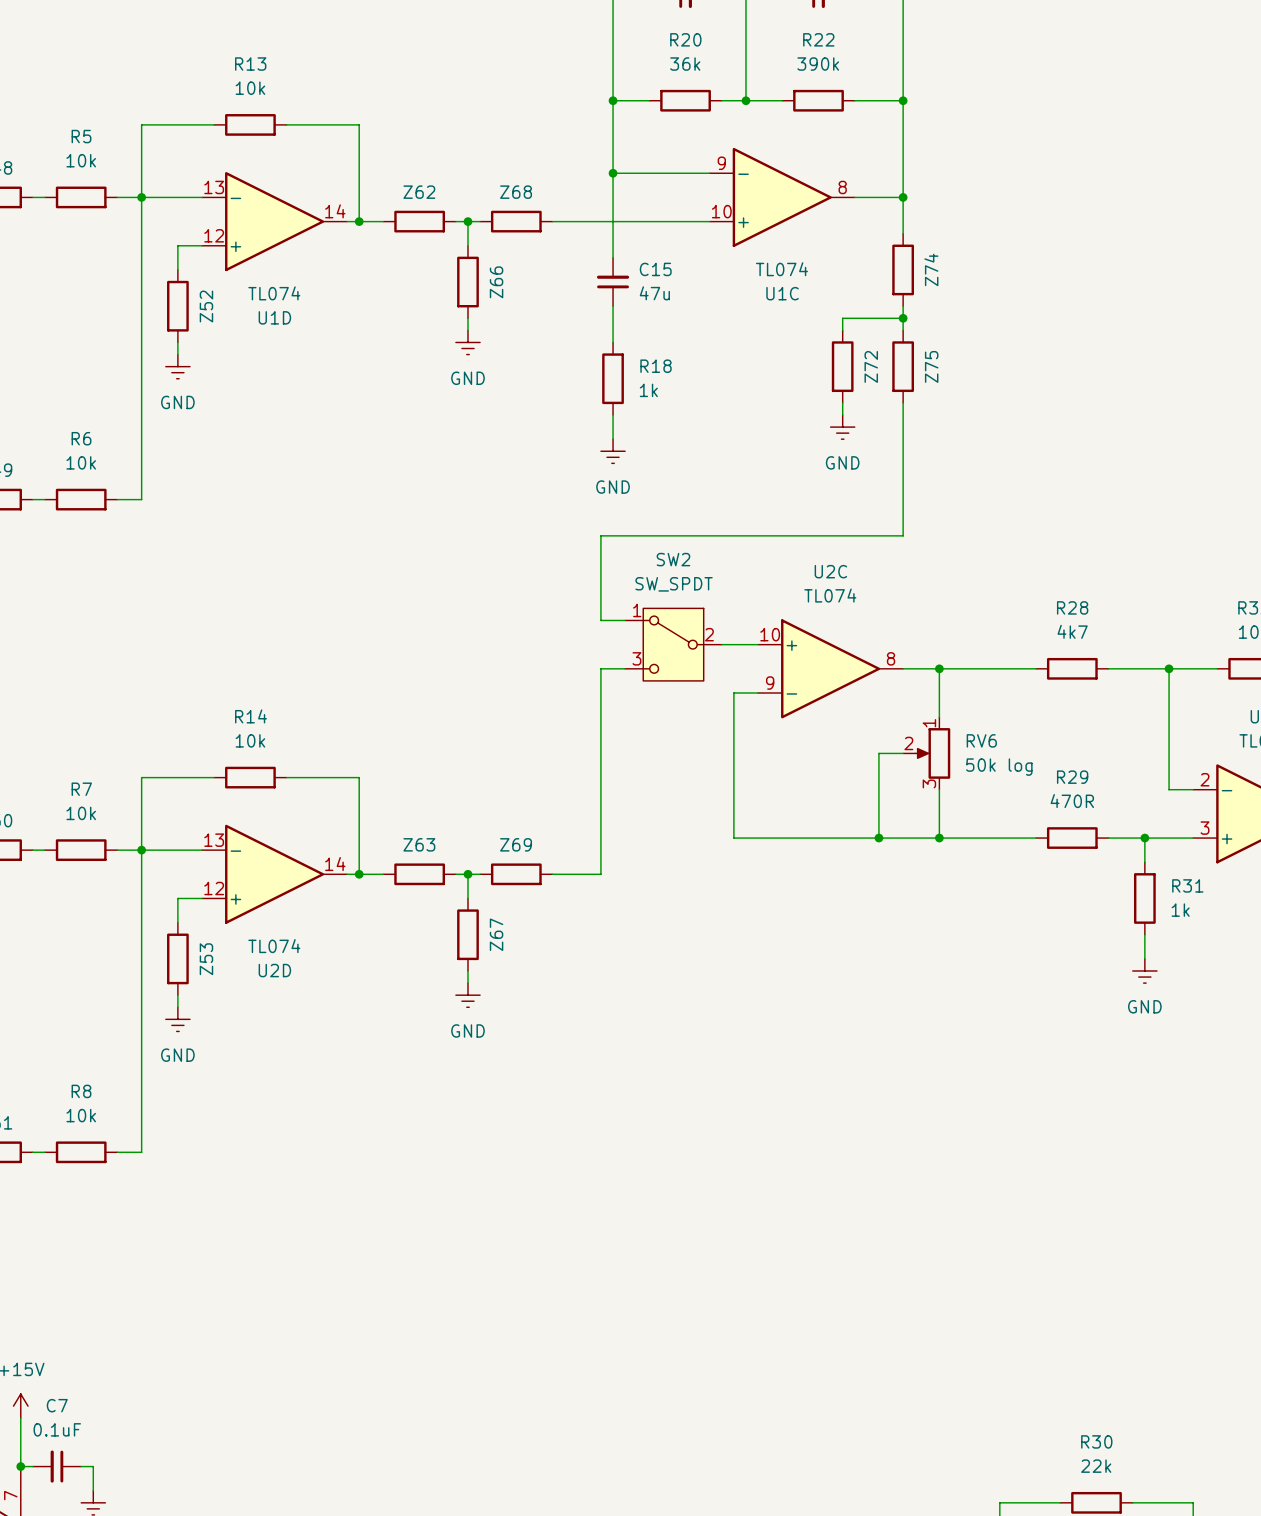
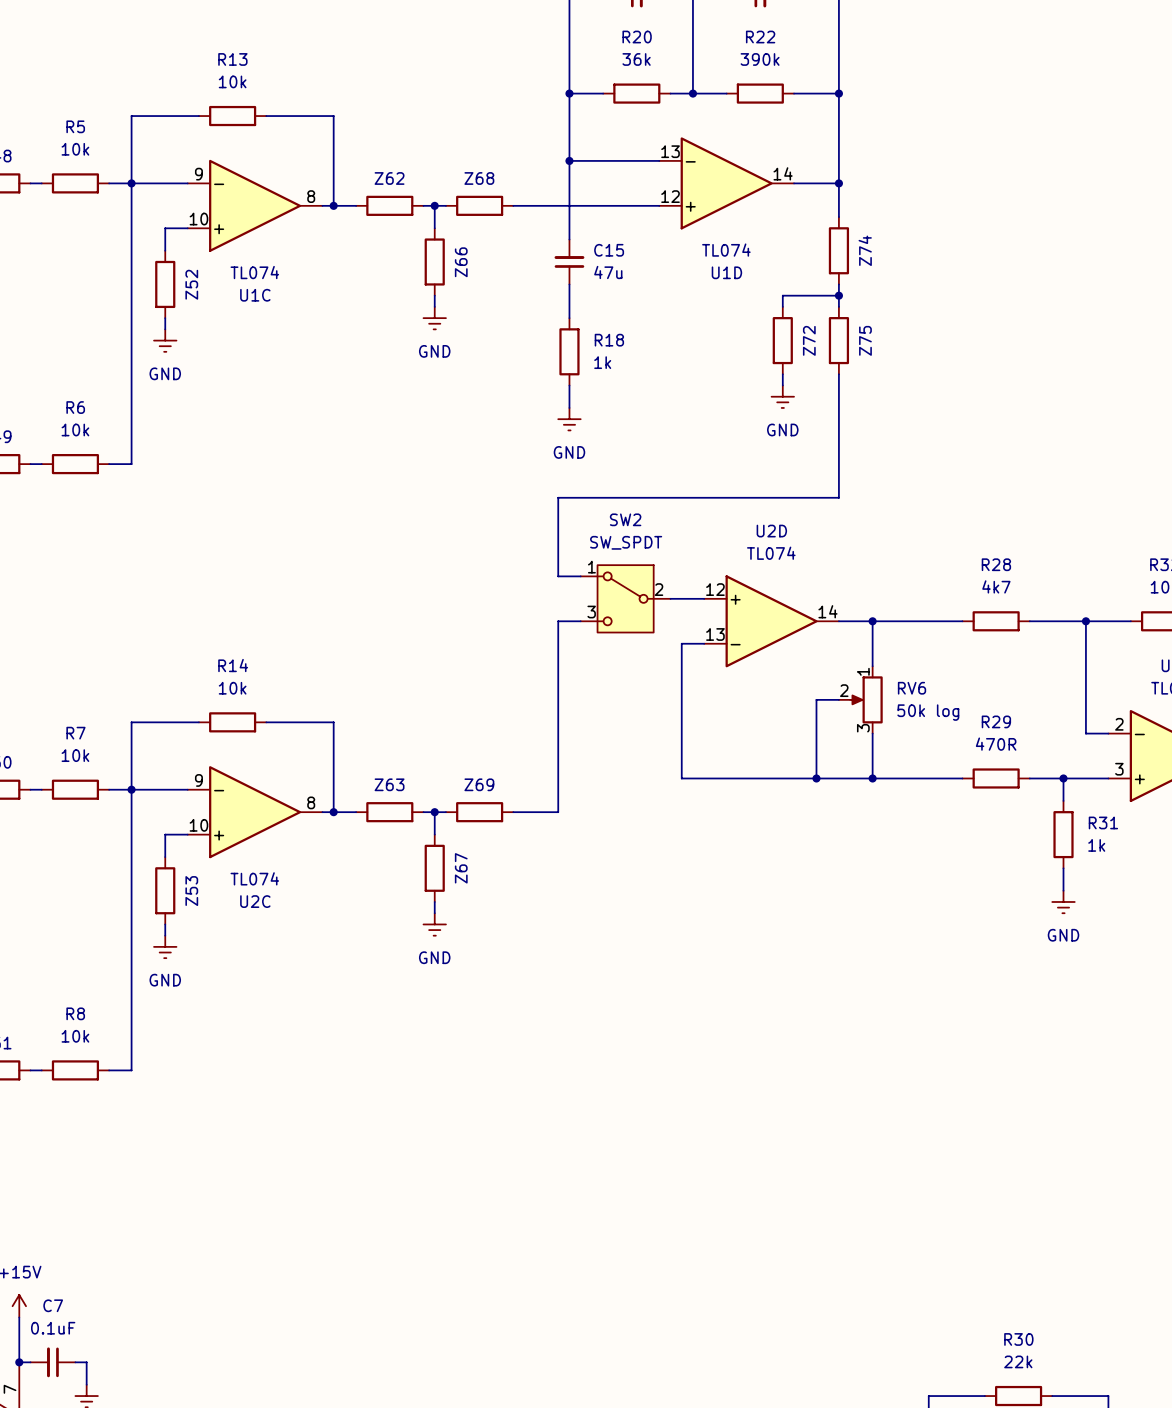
U1C position: (782, 197) -> (255, 205)
U1D position: (274, 221) -> (726, 183)
U2C flip: as is (830, 668) -> up-down (255, 812)
U2C position: (830, 668) -> (255, 812)
U2D flip: as is (274, 874) -> up-down (771, 621)
U2D position: (274, 874) -> (771, 621)

